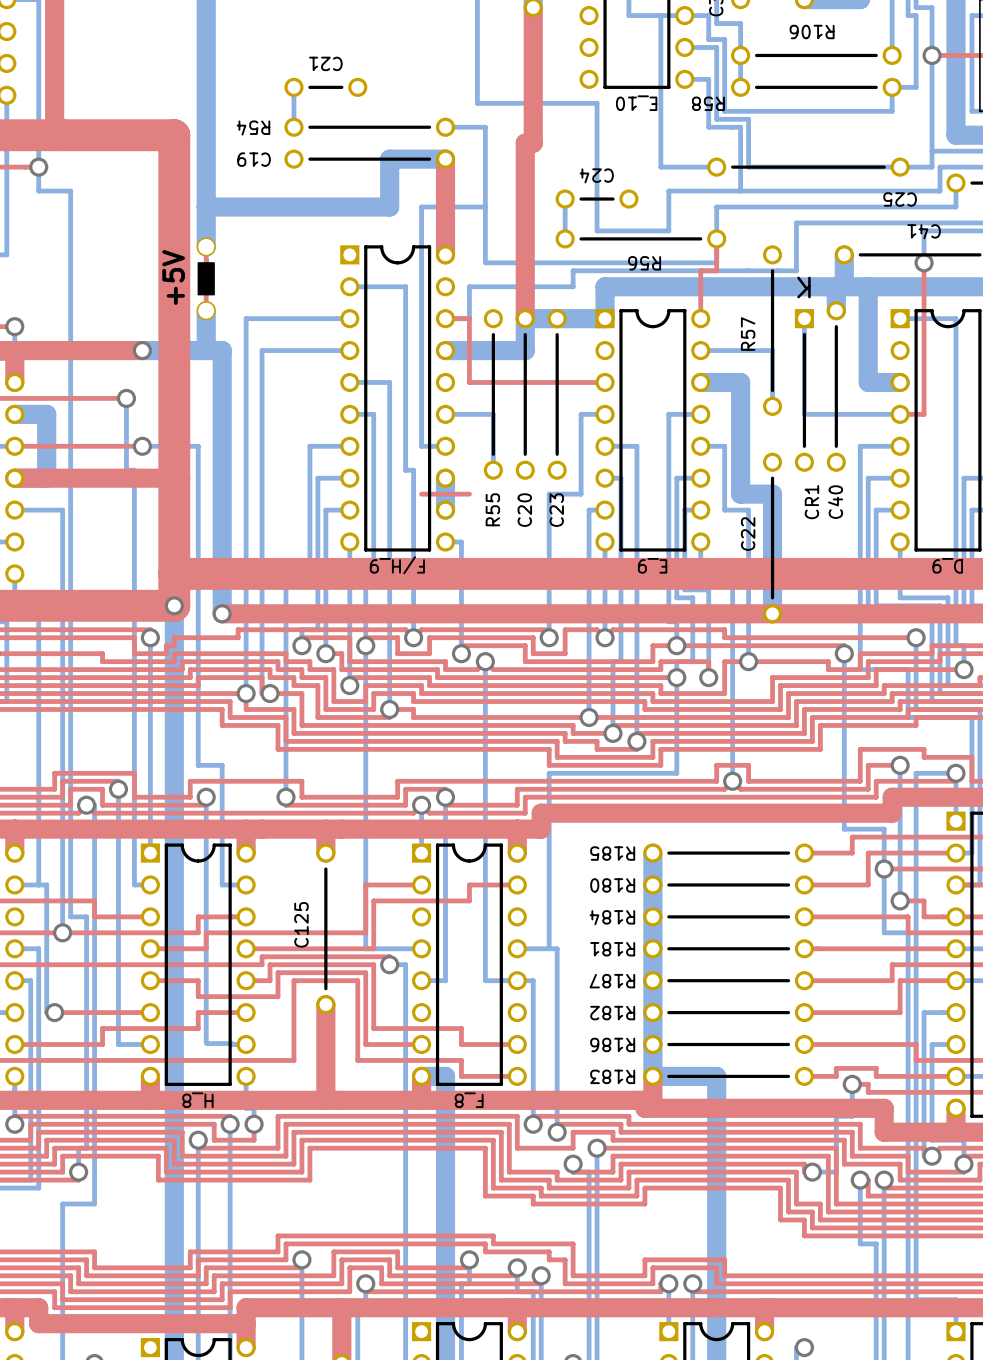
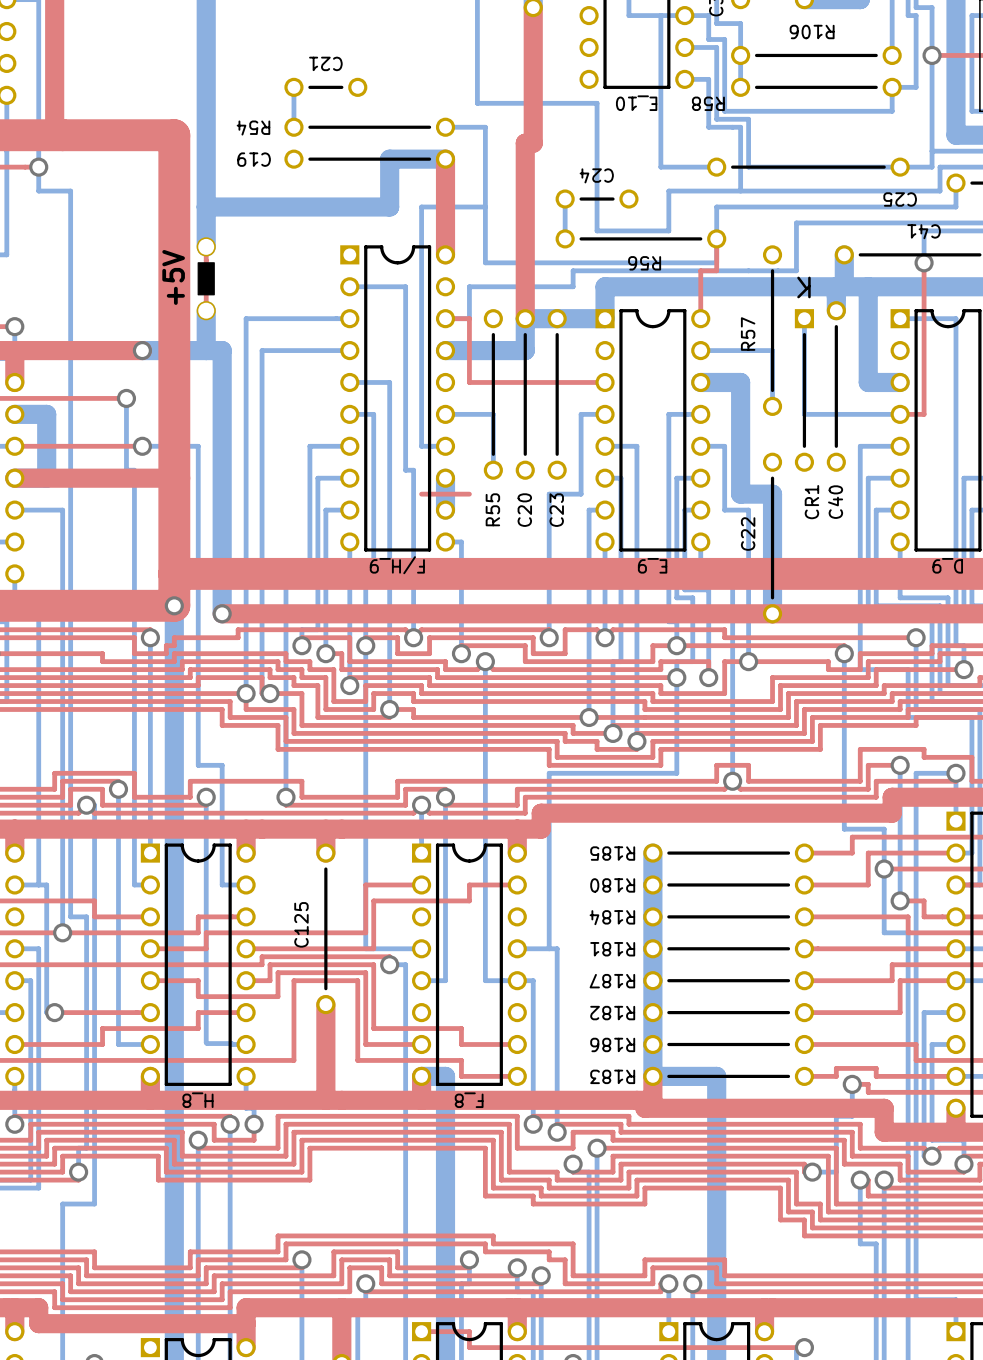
top track: none -> (421, 1331) (469, 1331) (469, 1347) (804, 1347)

